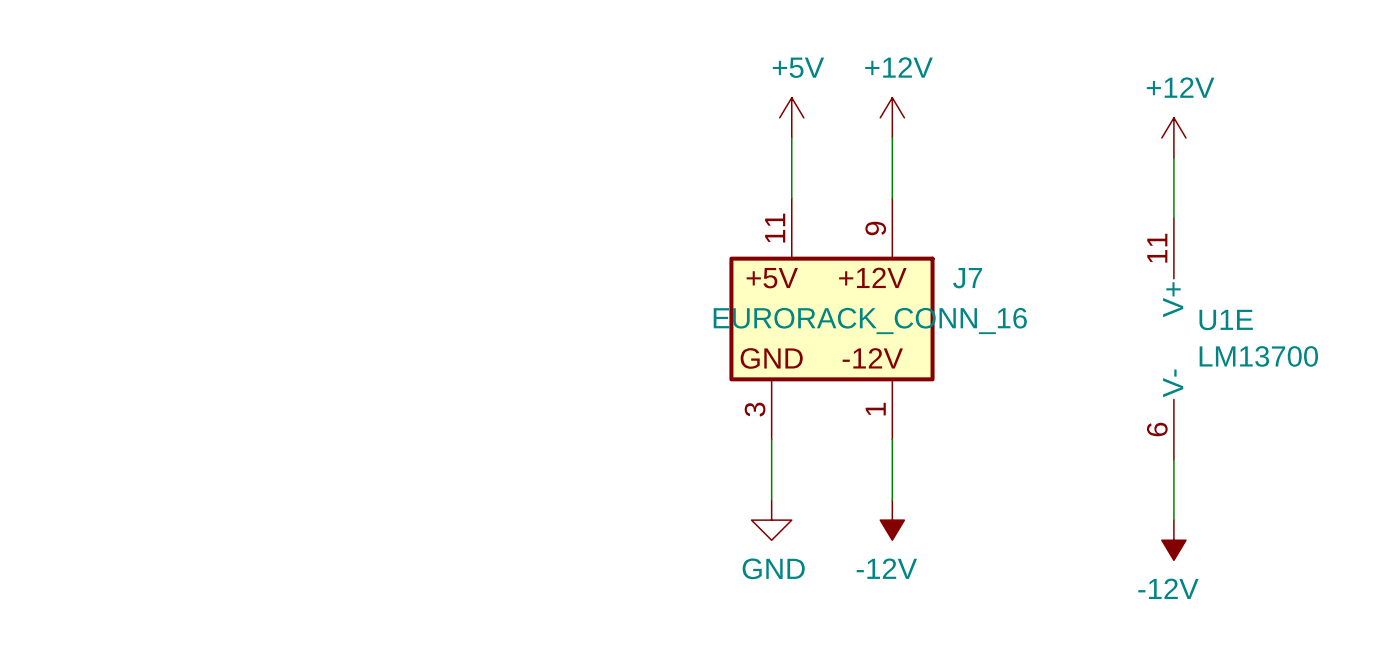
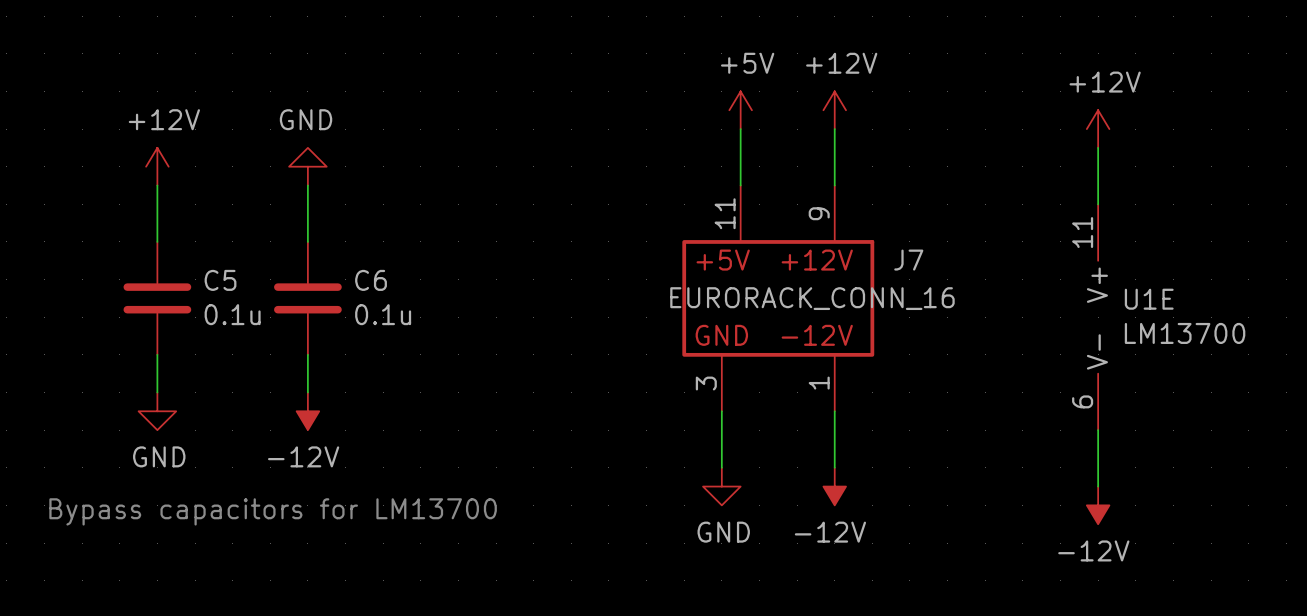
power symbol: none -> +12V (157, 166)
power symbol: none -> GND (307, 166)
wire: none -> (157, 185) (157, 241)
wire: none -> (307, 185) (307, 241)
C5: none -> 0.1u (157, 298)
C6: none -> 0.1u (307, 298)
wire: none -> (157, 354) (157, 392)
wire: none -> (307, 354) (307, 392)
power symbol: none -> GND (157, 411)
power symbol: none -> -12V (307, 411)
text: none -> Bypass capacitors for LM13700 (273, 511)

